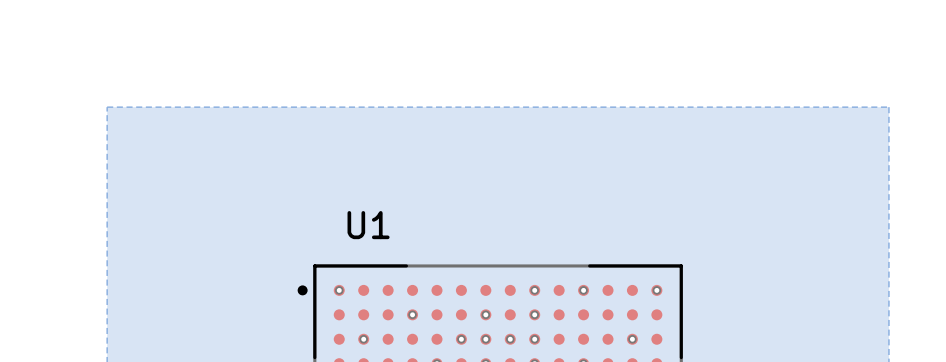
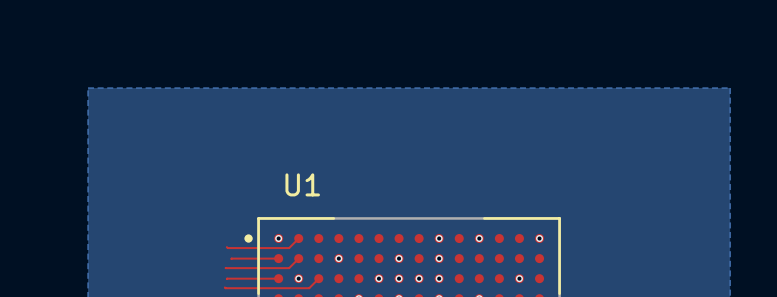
top track: none -> (298, 238) (289, 248) (226, 247)
top track: none -> (278, 258) (231, 258)
top track: none -> (298, 258) (289, 268) (225, 268)
top track: none -> (227, 278) (278, 278)
top track: none -> (318, 278) (309, 288) (224, 287)

